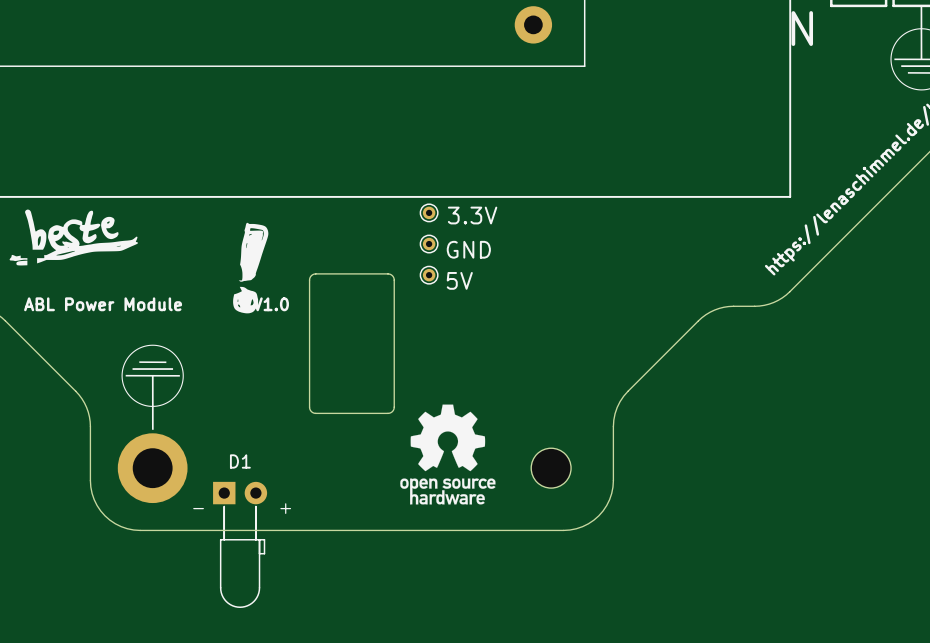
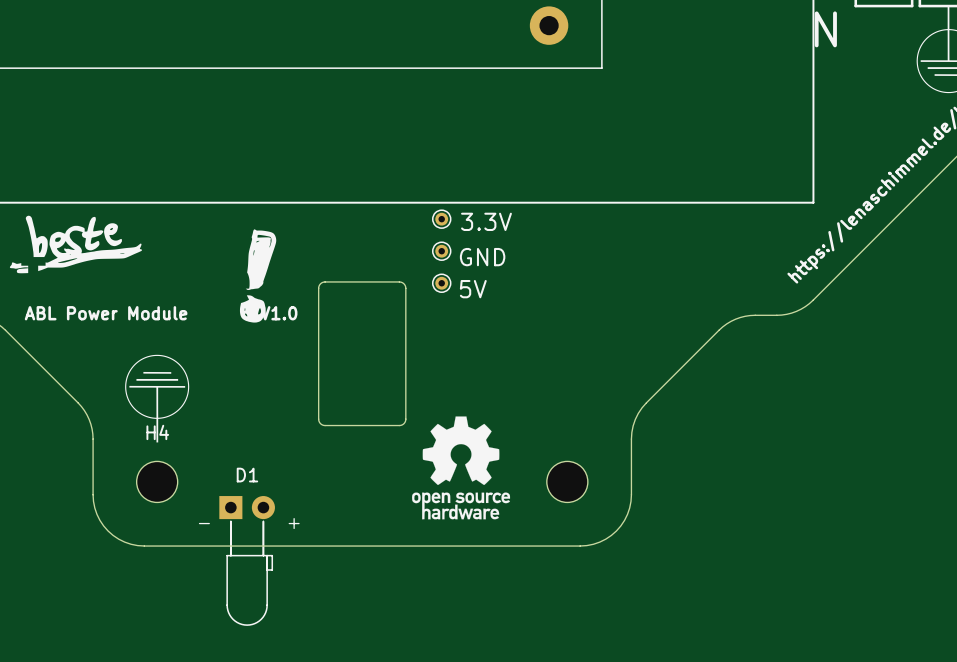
part: (152, 468) -> none
H4: none -> (157, 481)

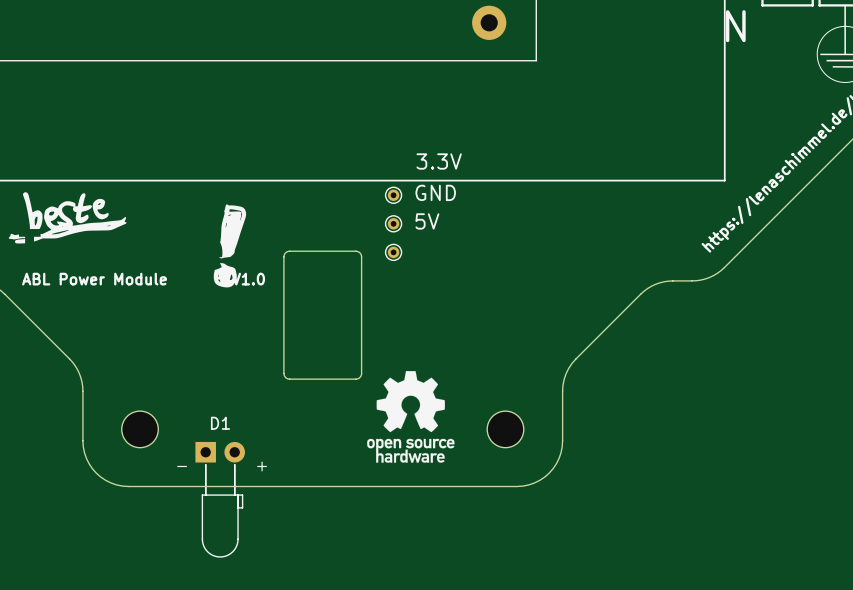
text: none -> 3.3V (439, 161)
text: 3.3V (486, 221) -> GND (435, 192)
text: GND (482, 257) -> 5V (427, 221)
text: 5V (473, 289) -> none
drawing: [125, 354, 190, 443] -> none
H4 name: H4 (157, 432) -> none

